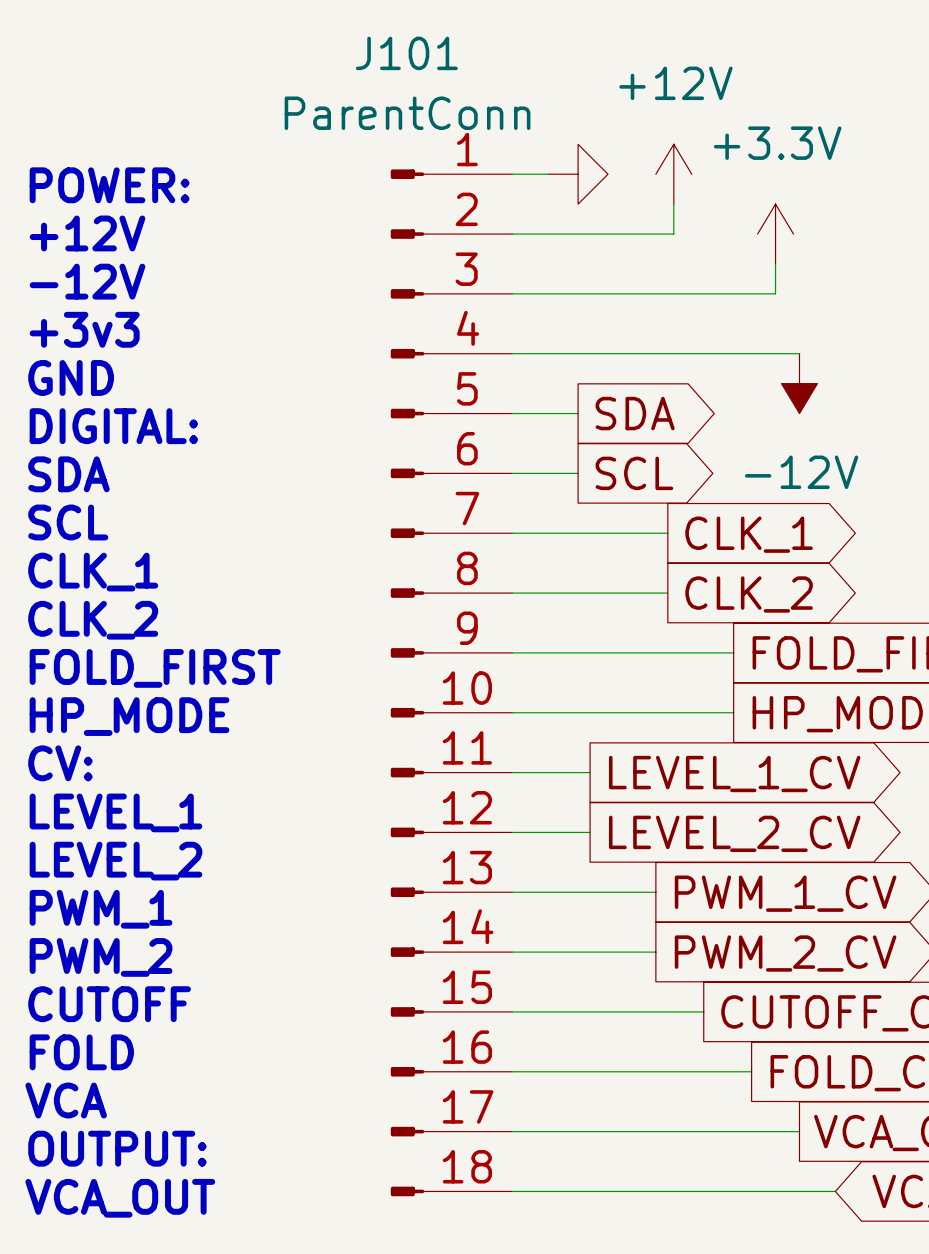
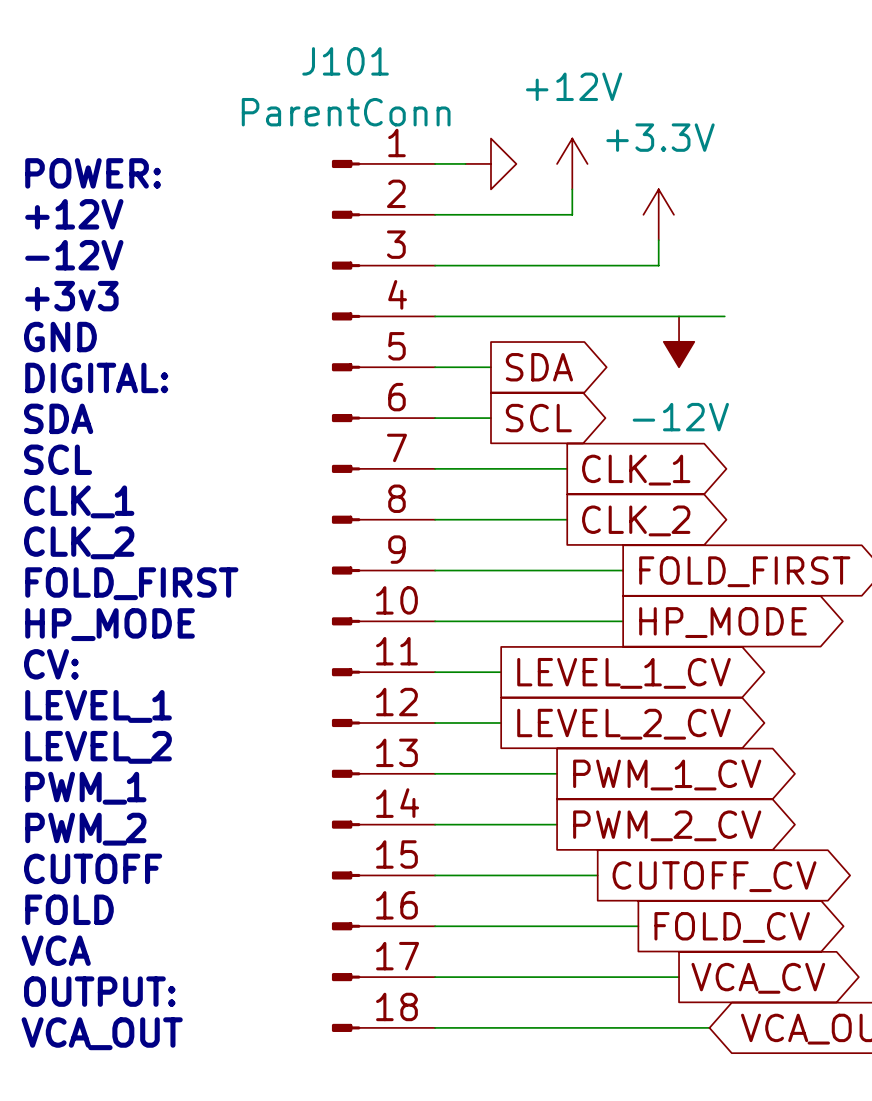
wire: none -> (679, 316) (724, 316)

